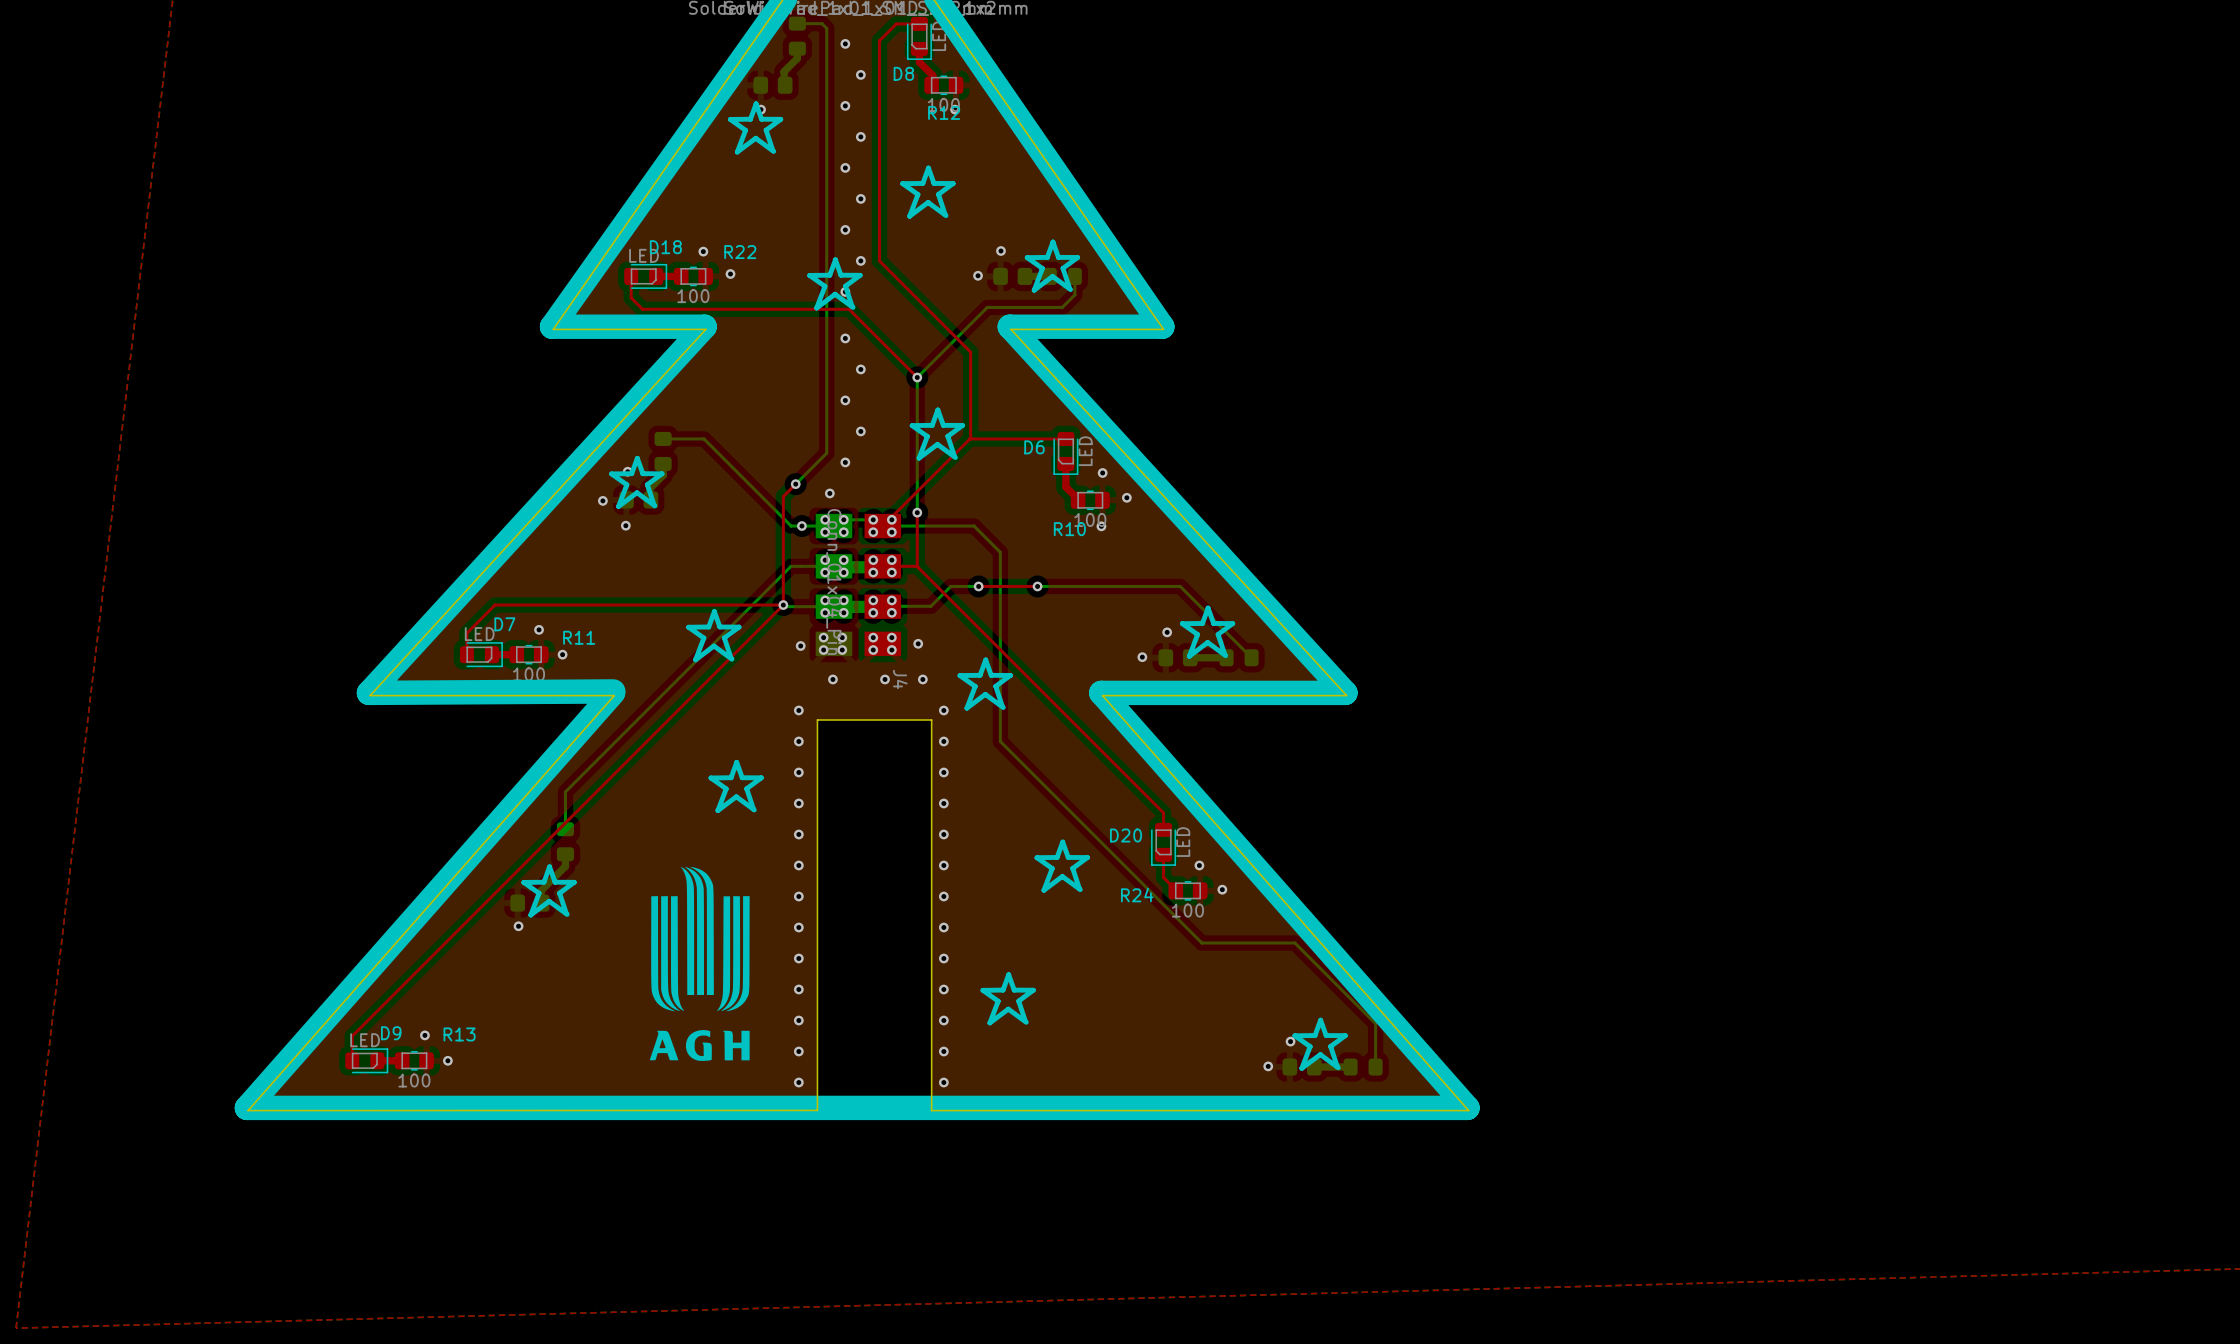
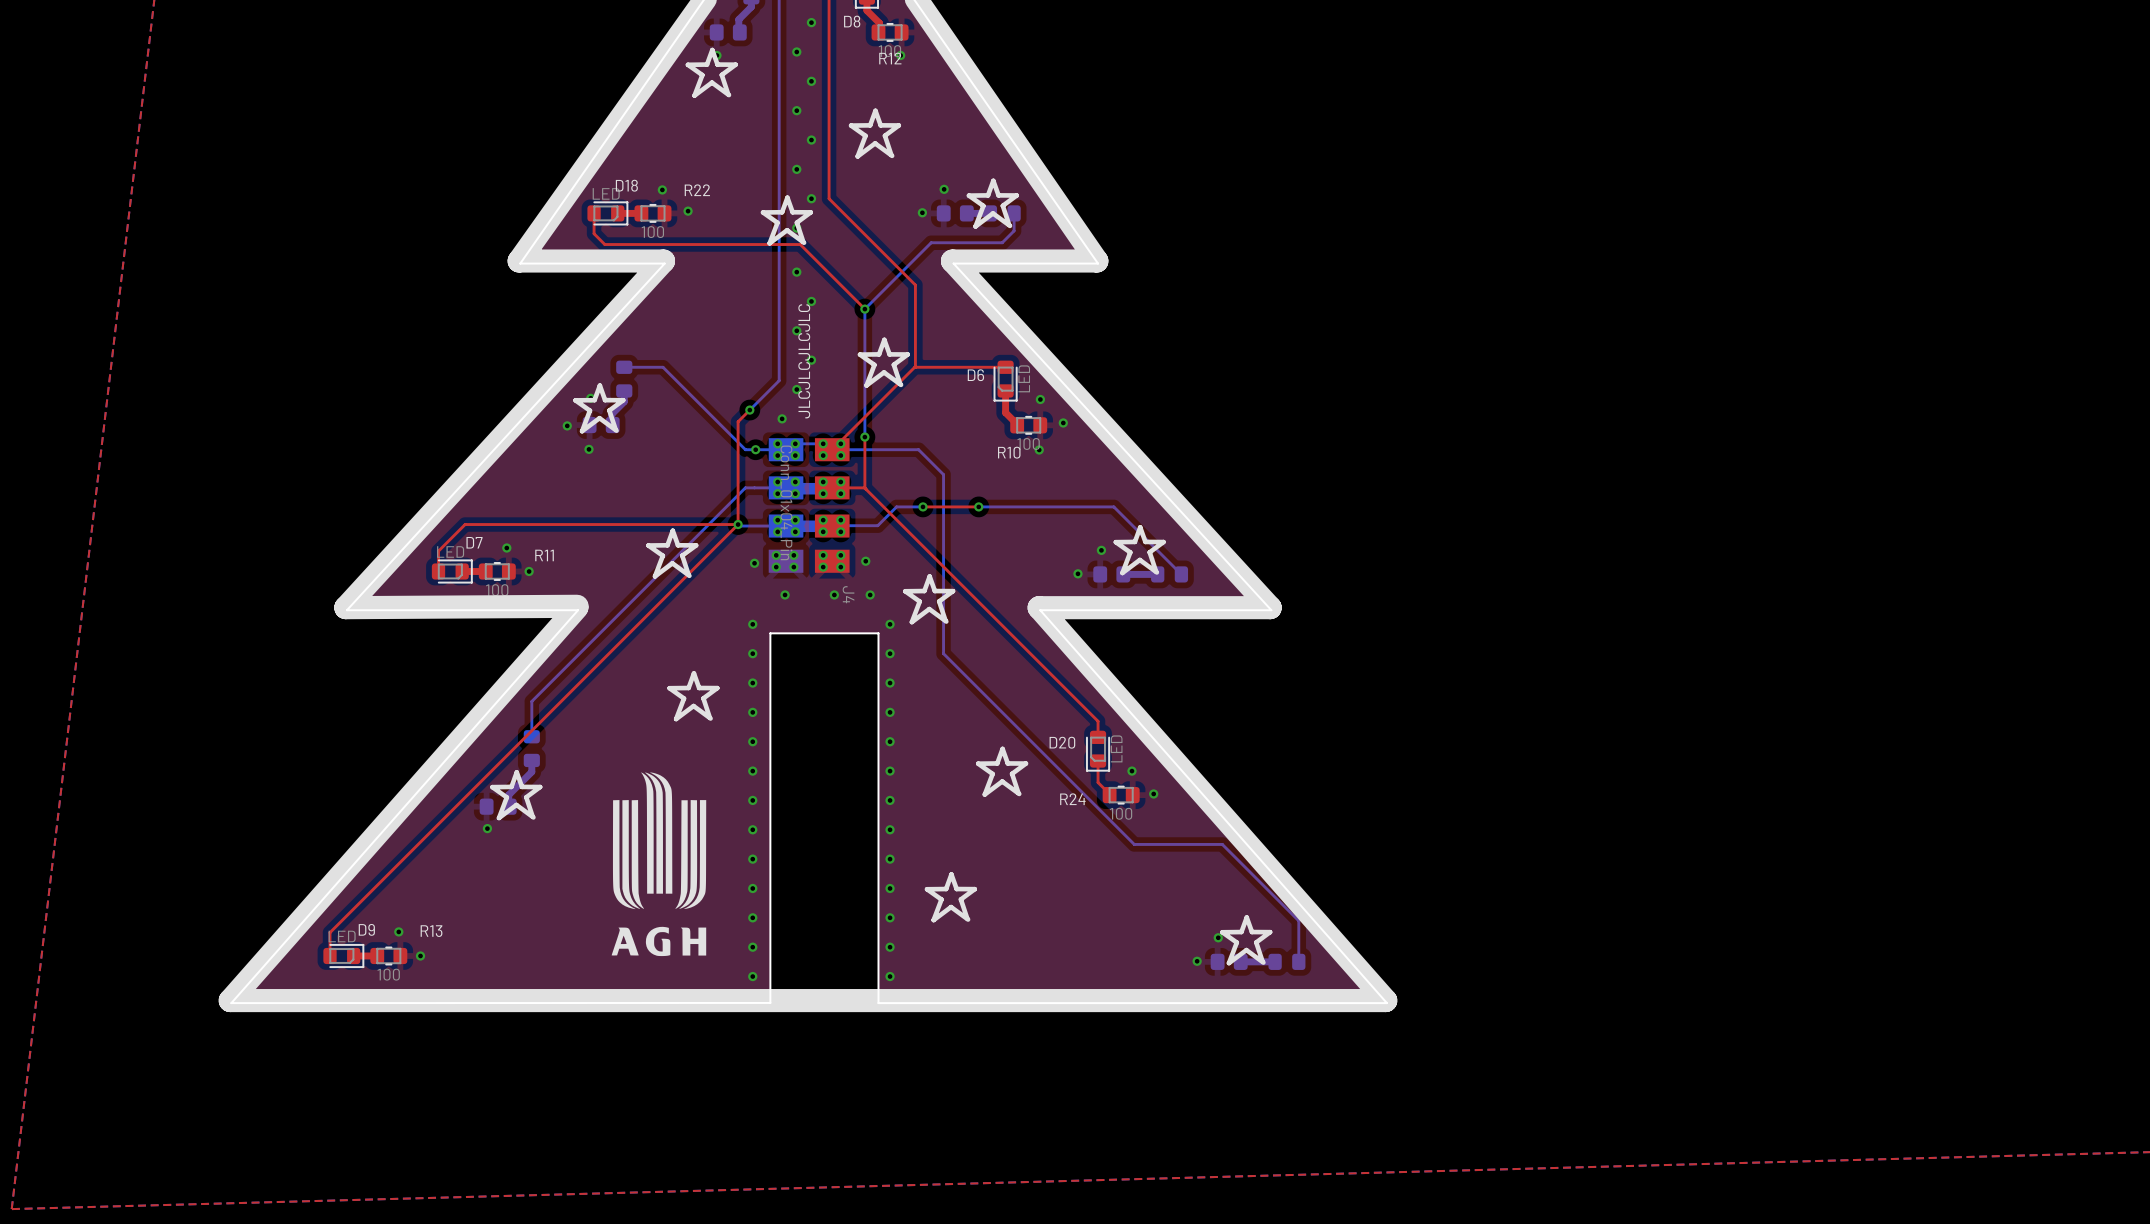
text: none -> JLCJLCJLCJLC (804, 361)

